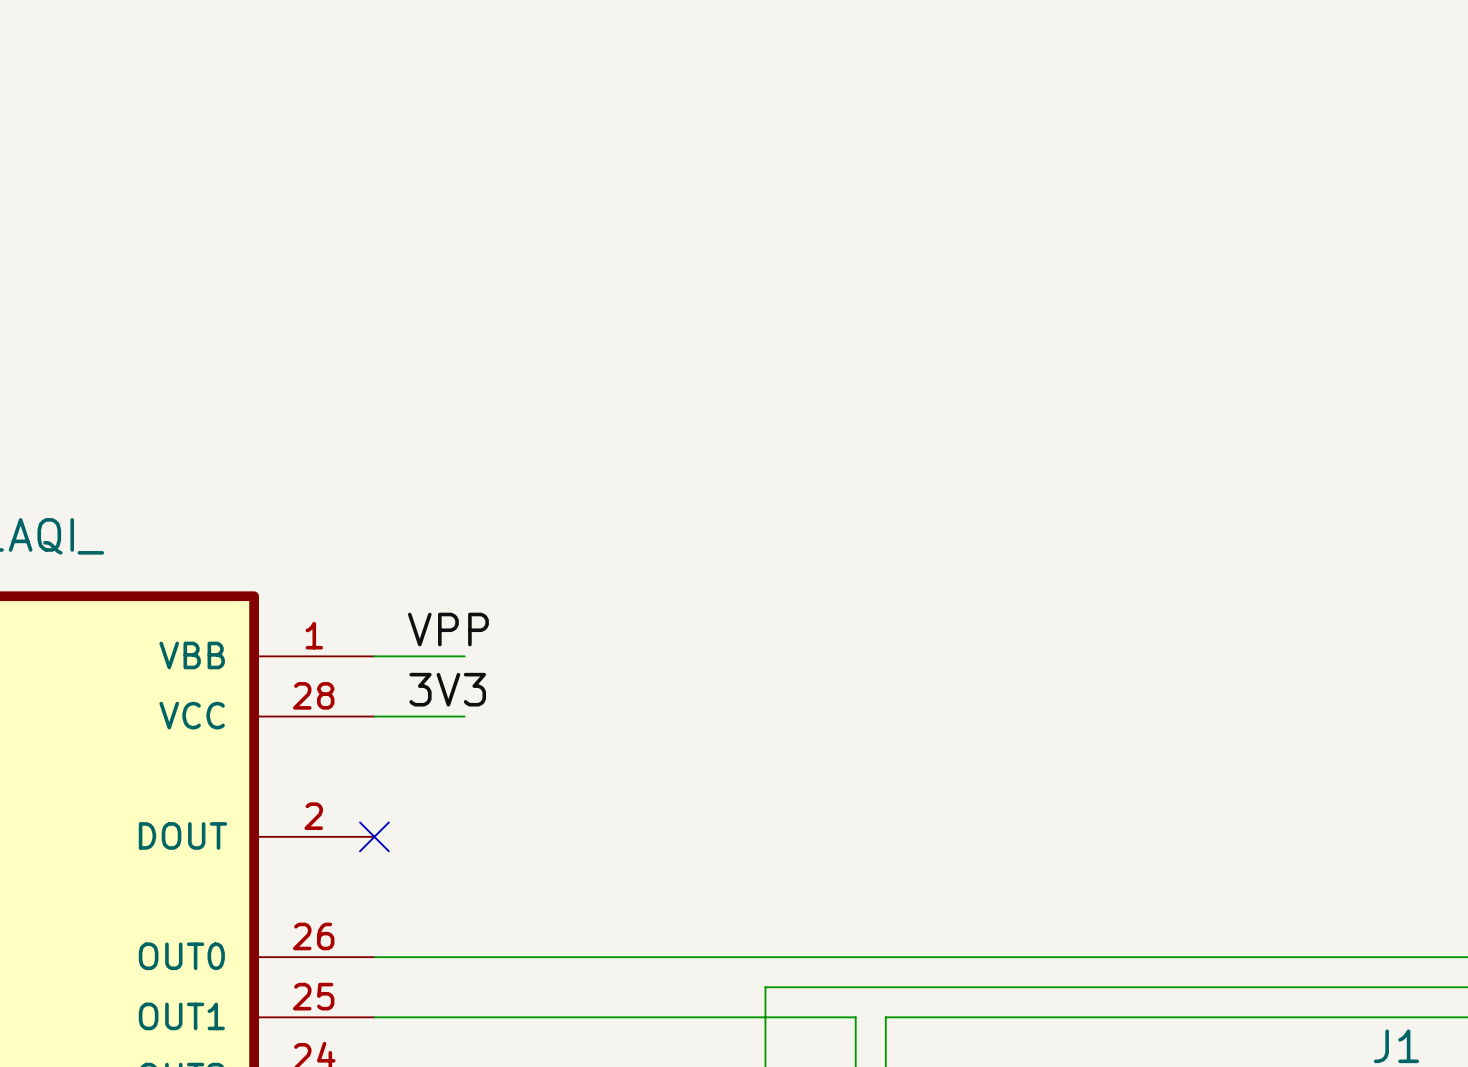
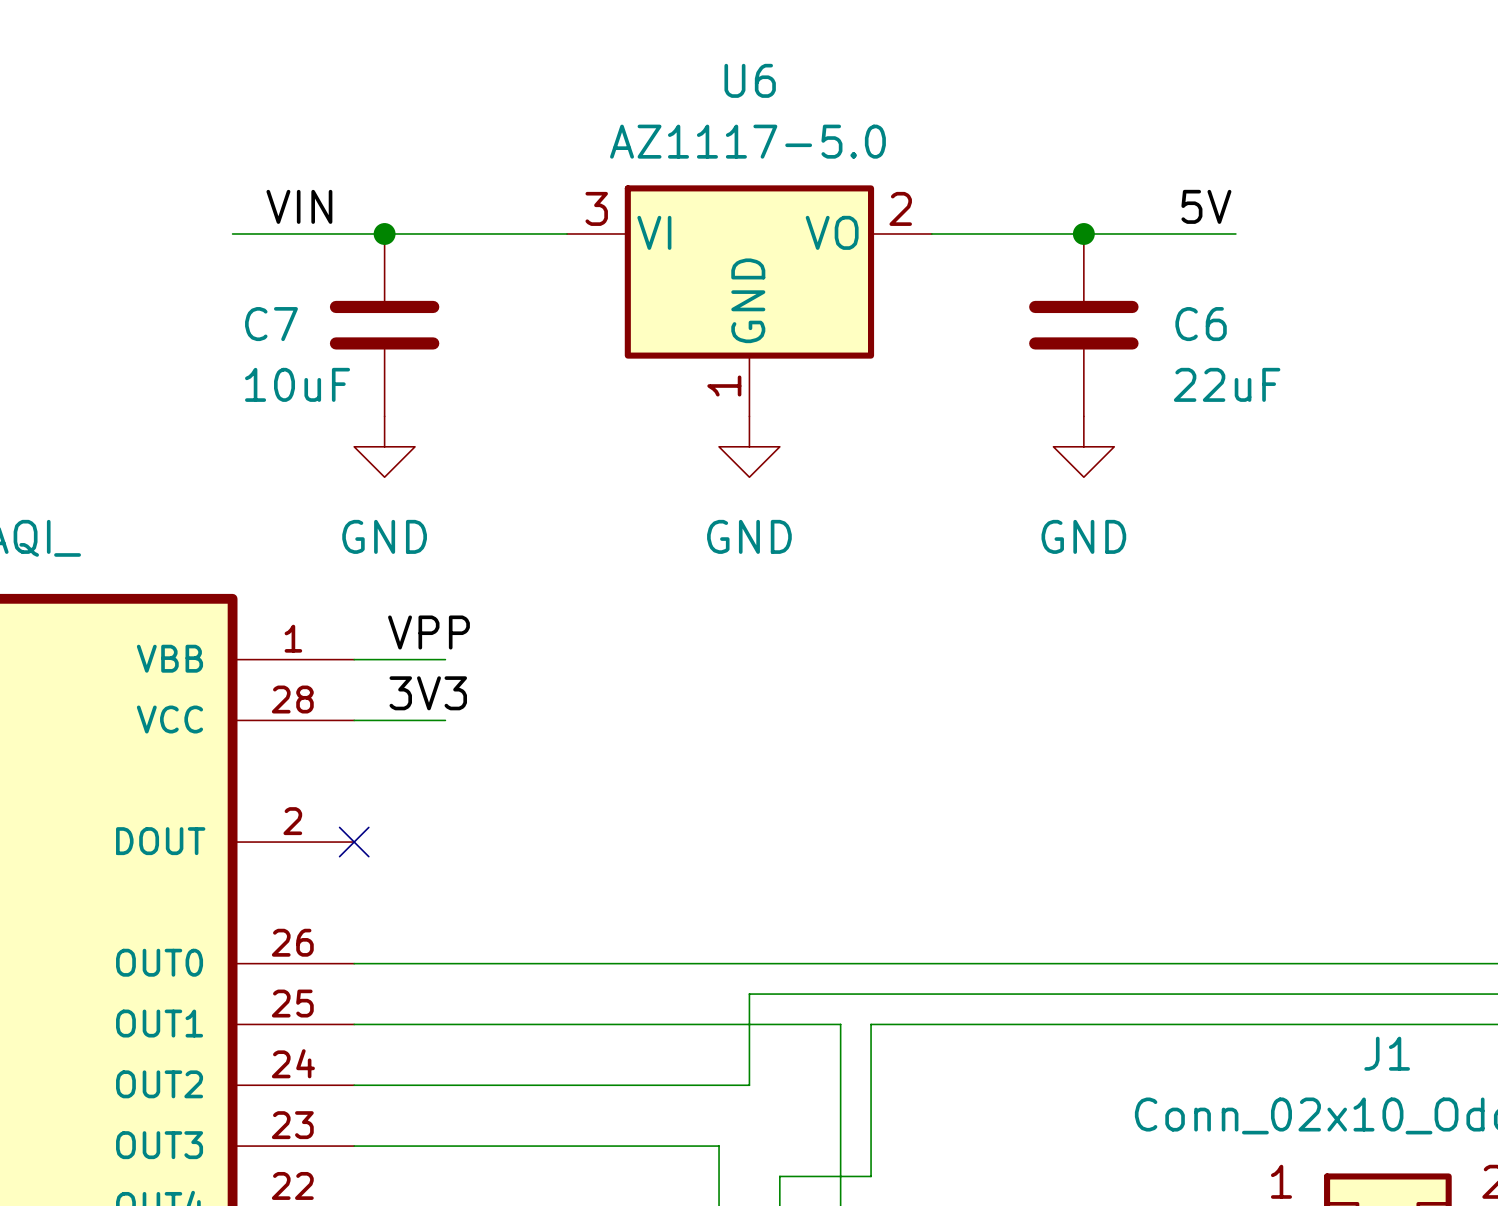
label: none -> VIN (299, 206)
label: none -> 5V (1206, 206)
wire: none -> (232, 233) (567, 233)
junction: none -> (384, 233)
wire: none -> (931, 233) (1235, 233)
junction: none -> (1083, 233)
U6: none -> AZ1117-5.0 (749, 300)
C7: none -> 10uF (384, 325)
C6: none -> 22uF (1083, 325)
power symbol: none -> GND (384, 446)
power symbol: none -> GND (749, 446)
power symbol: none -> GND (1083, 446)

